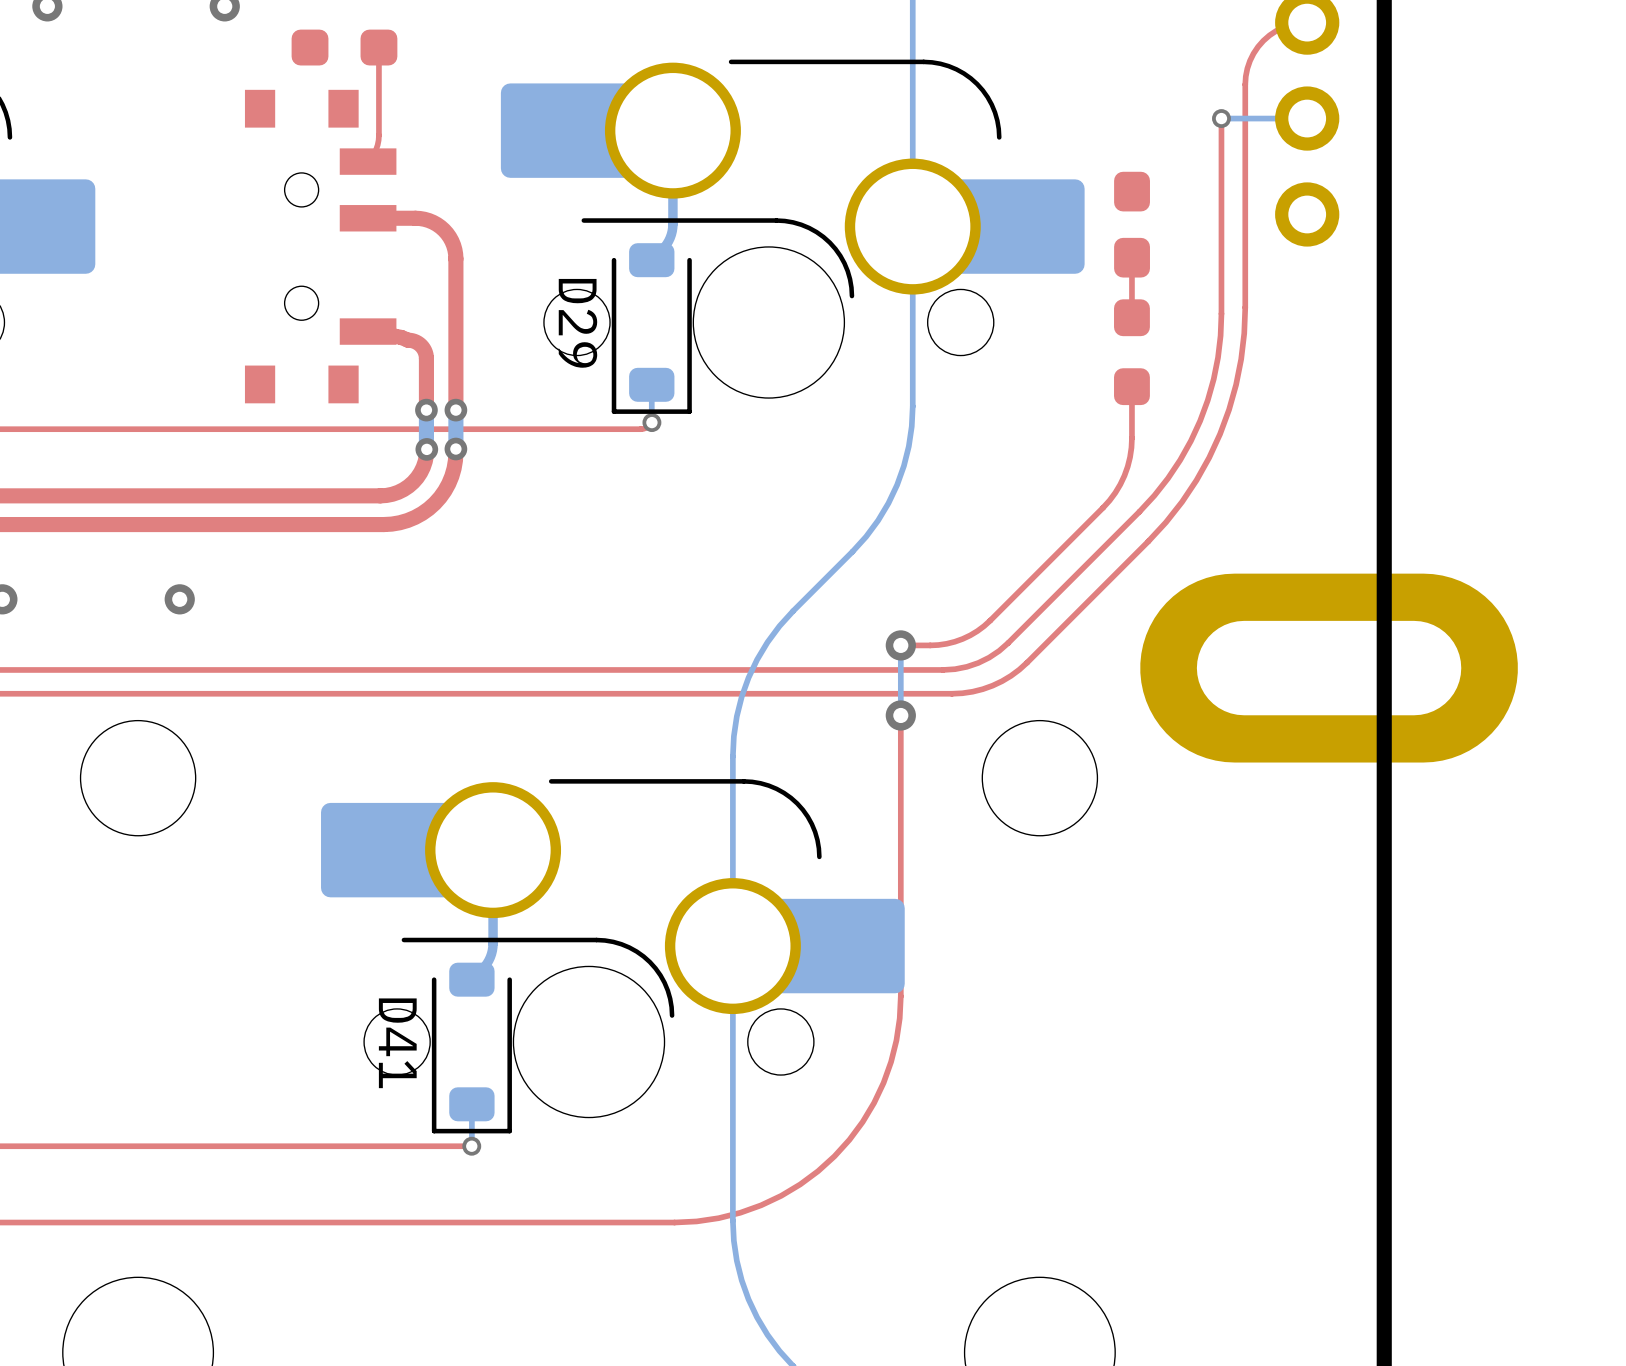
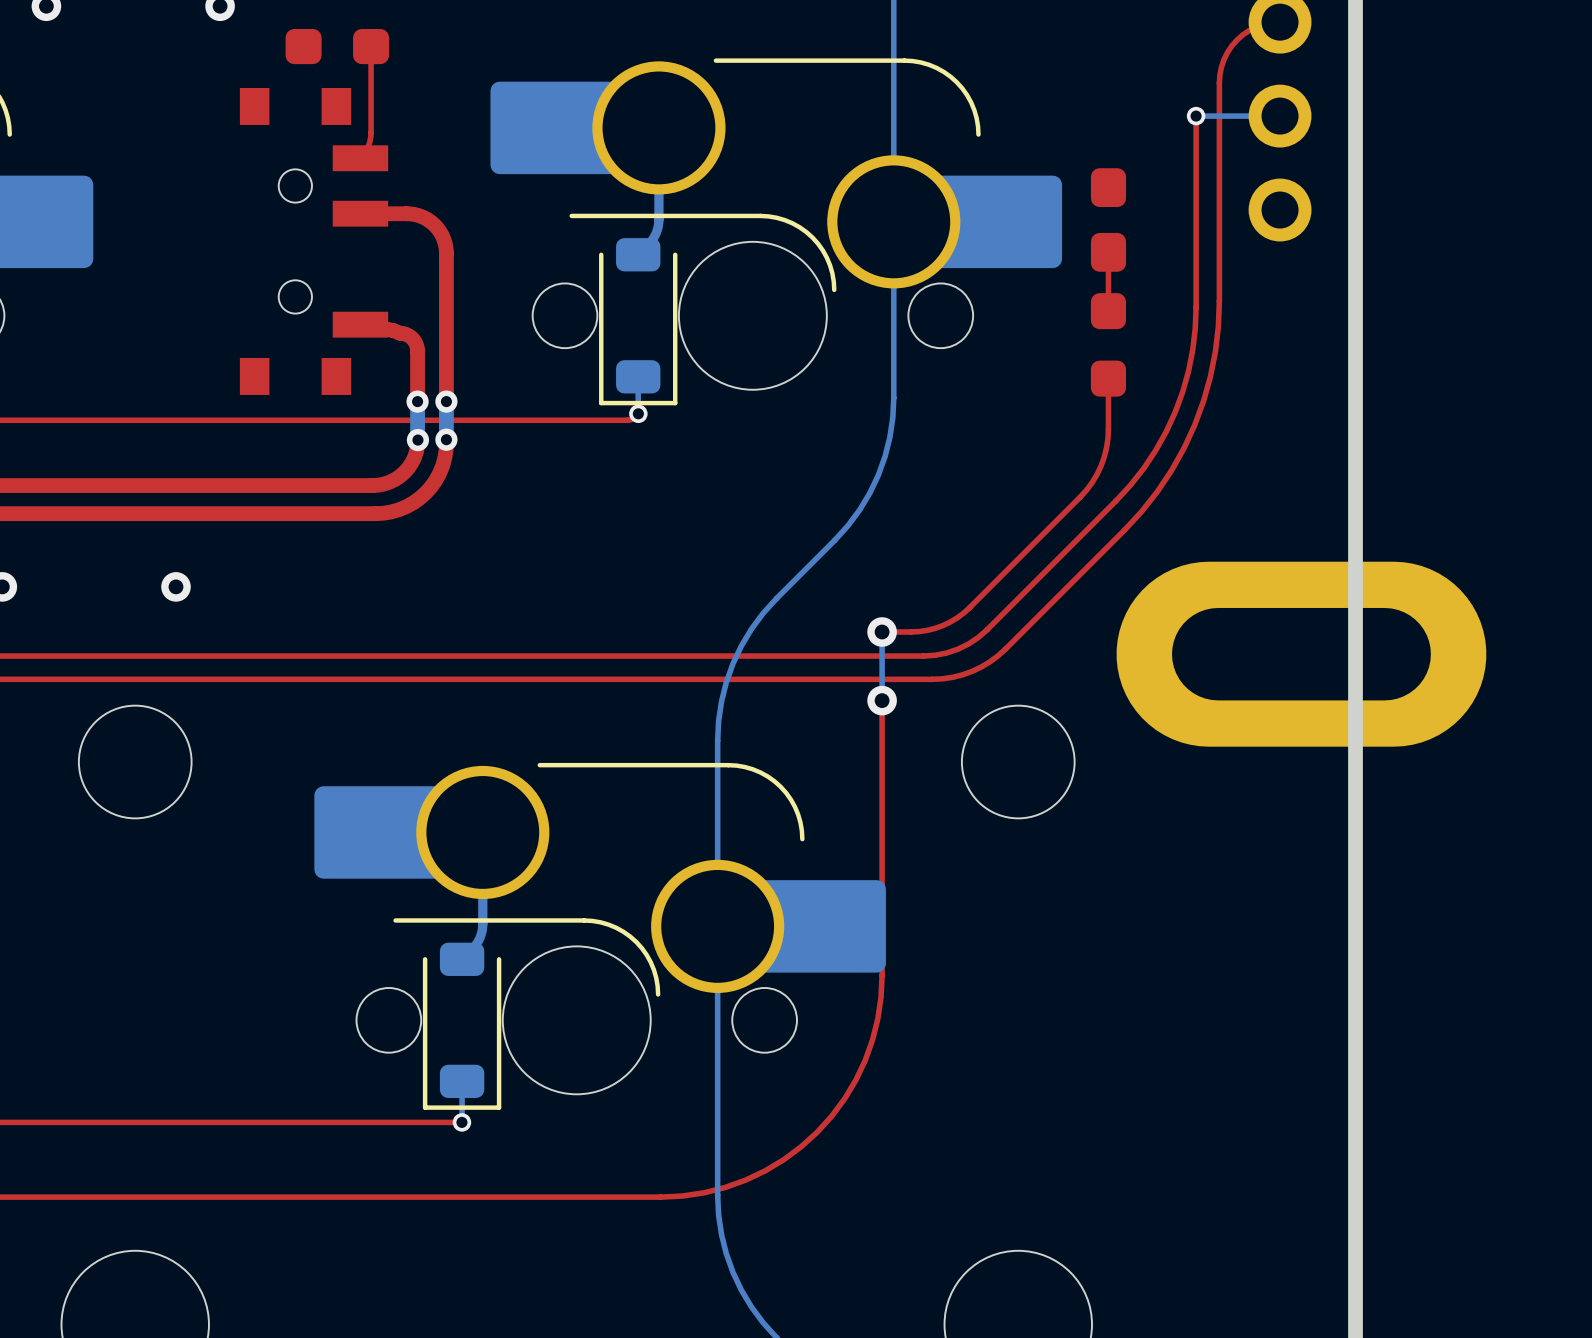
D29 name: D29 (577, 323) -> none
D41 name: D41 (397, 1043) -> none

